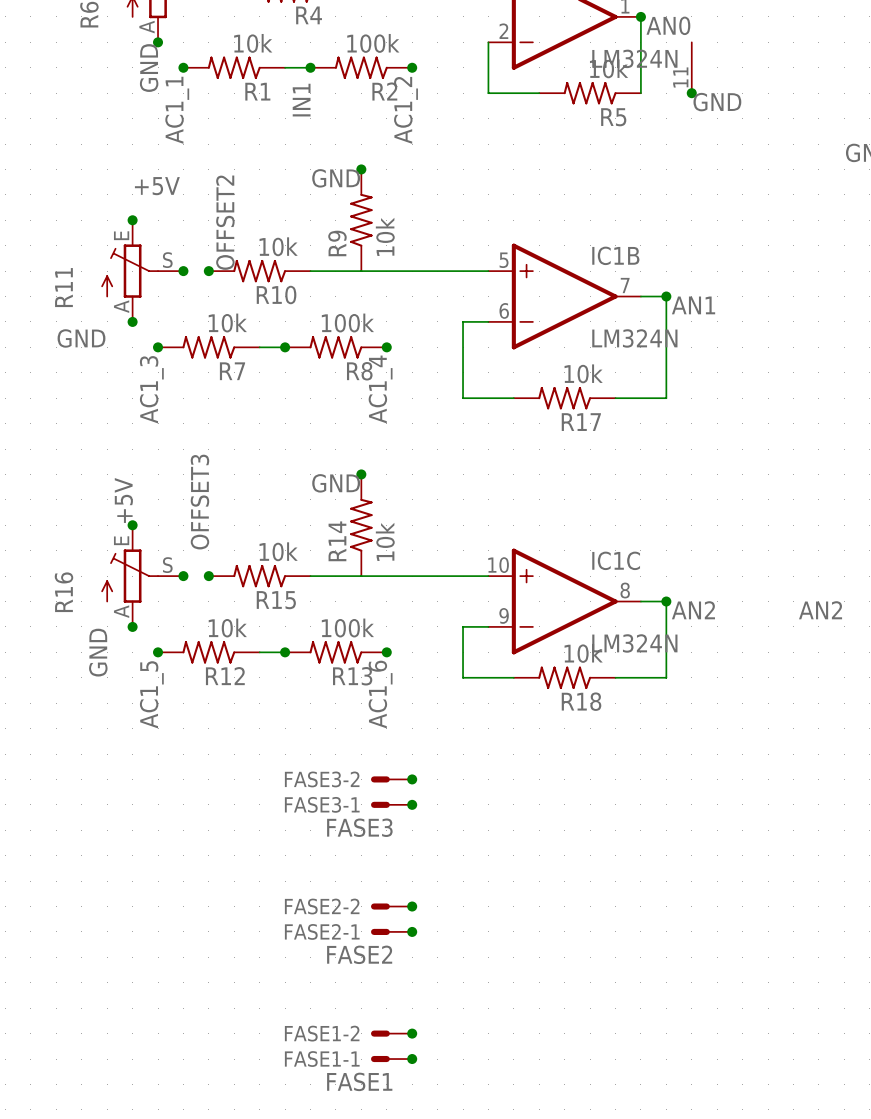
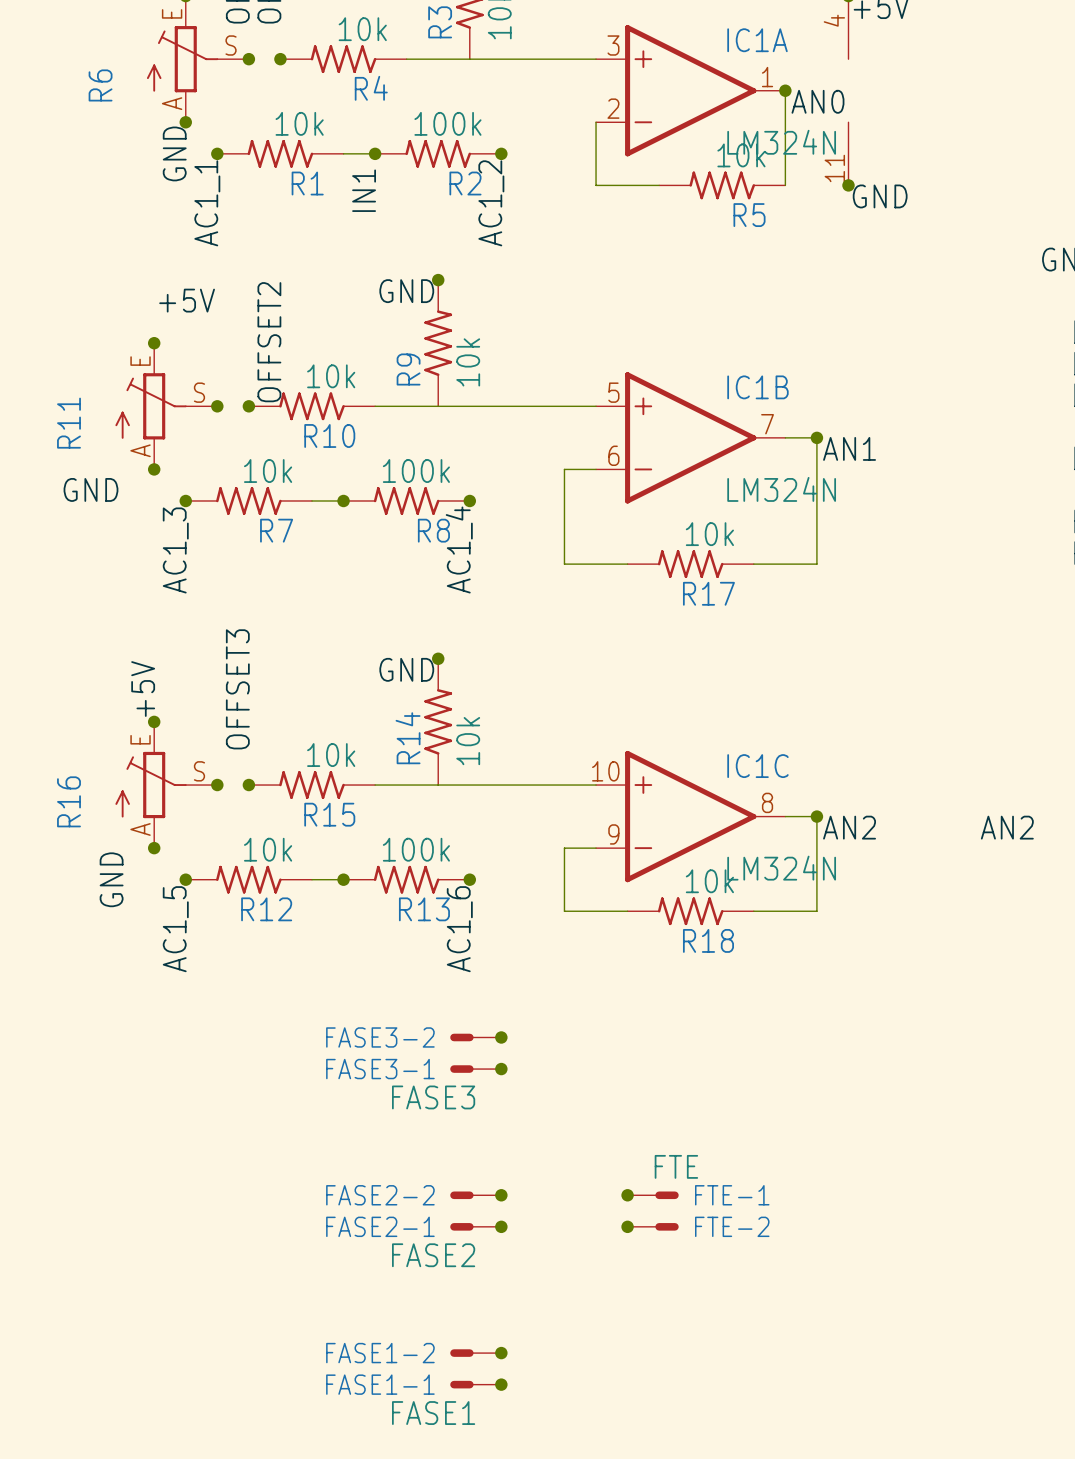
junction: none -> (627, 1195)
FTE-1: none -> FTE (653, 1195)
junction: none -> (627, 1226)
FTE-2: none -> (653, 1226)

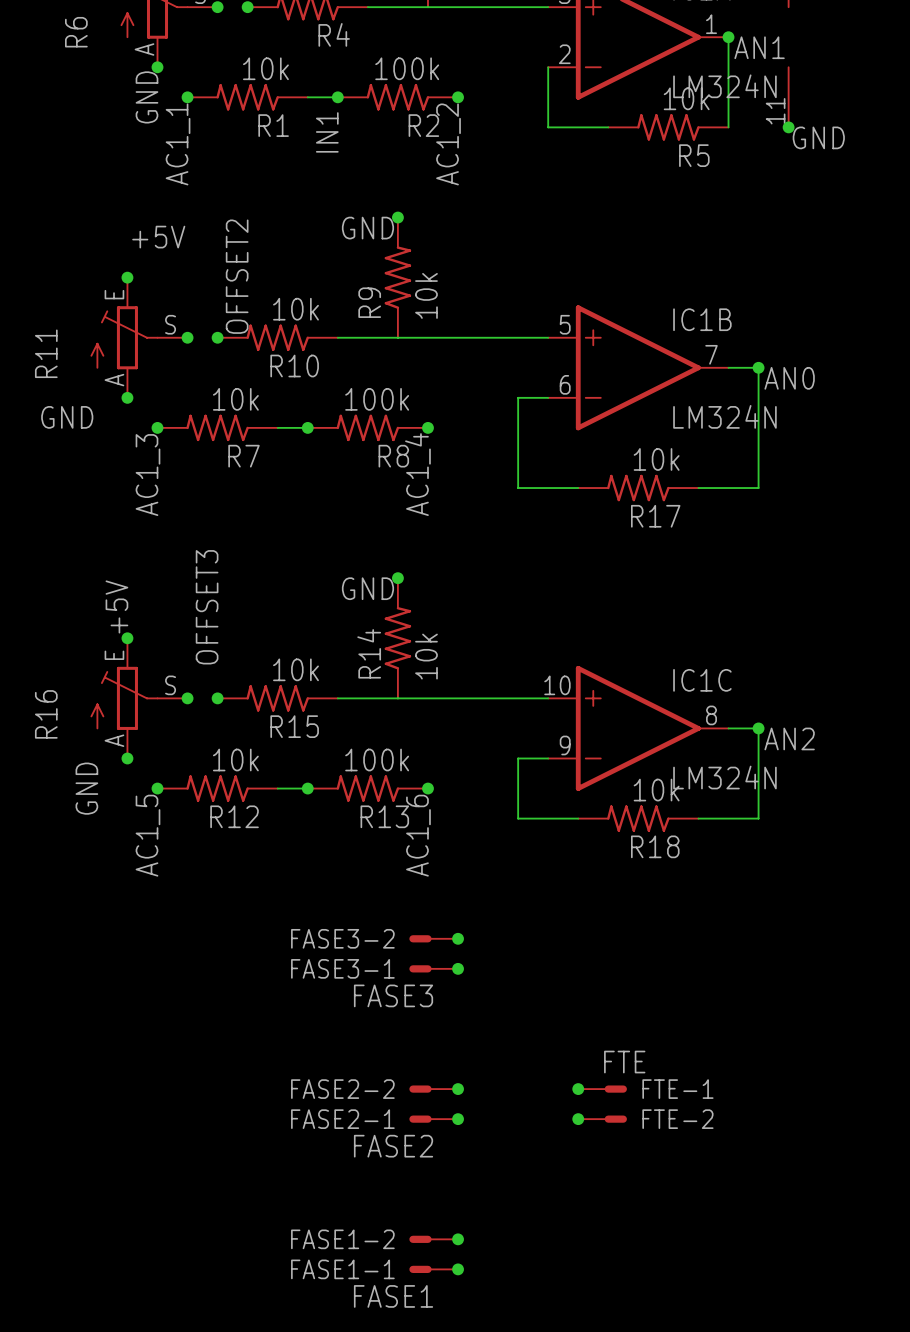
label: AN0 (817, 101) -> AN1 (759, 47)
label: AN1 (849, 448) -> AN0 (789, 378)

